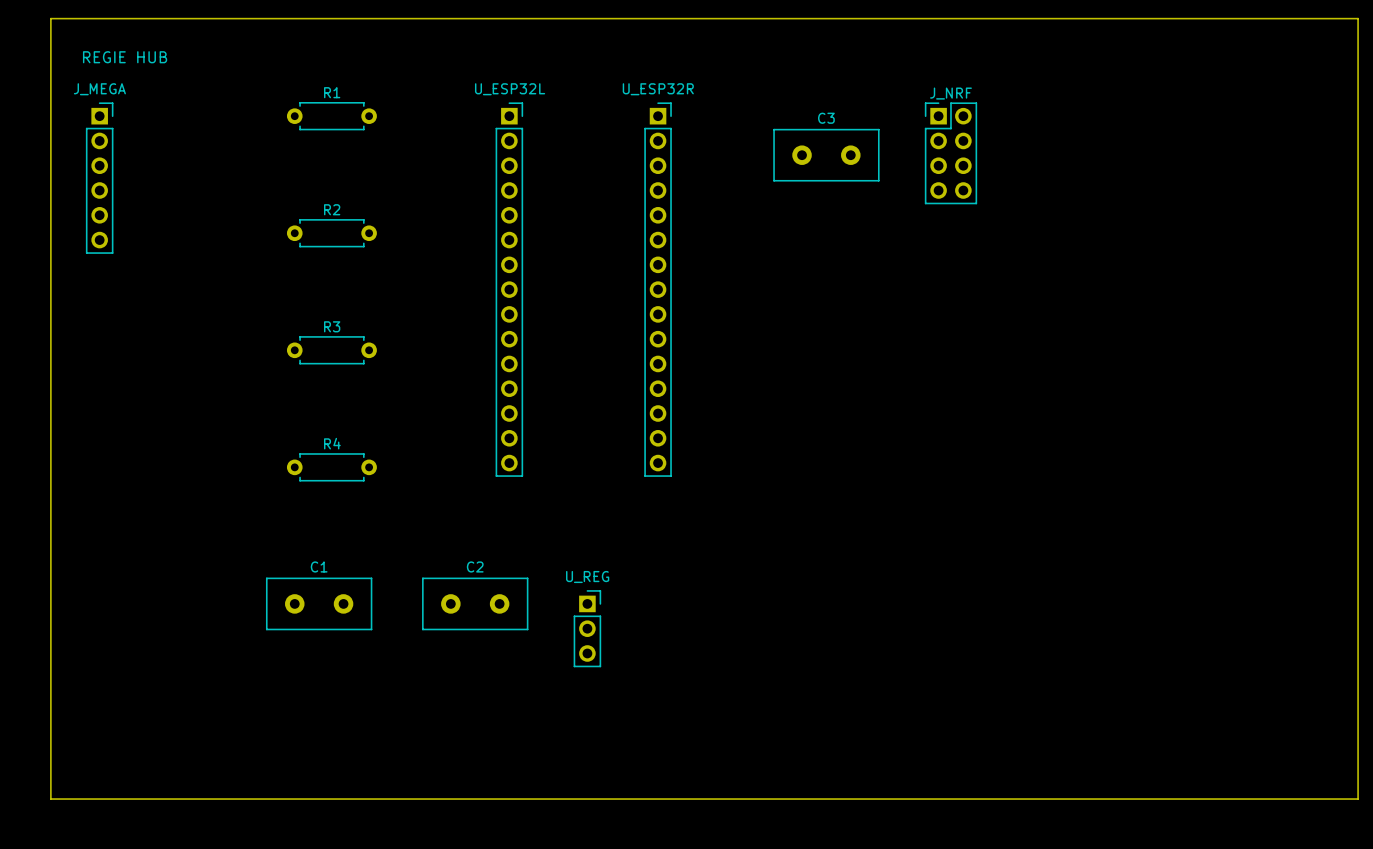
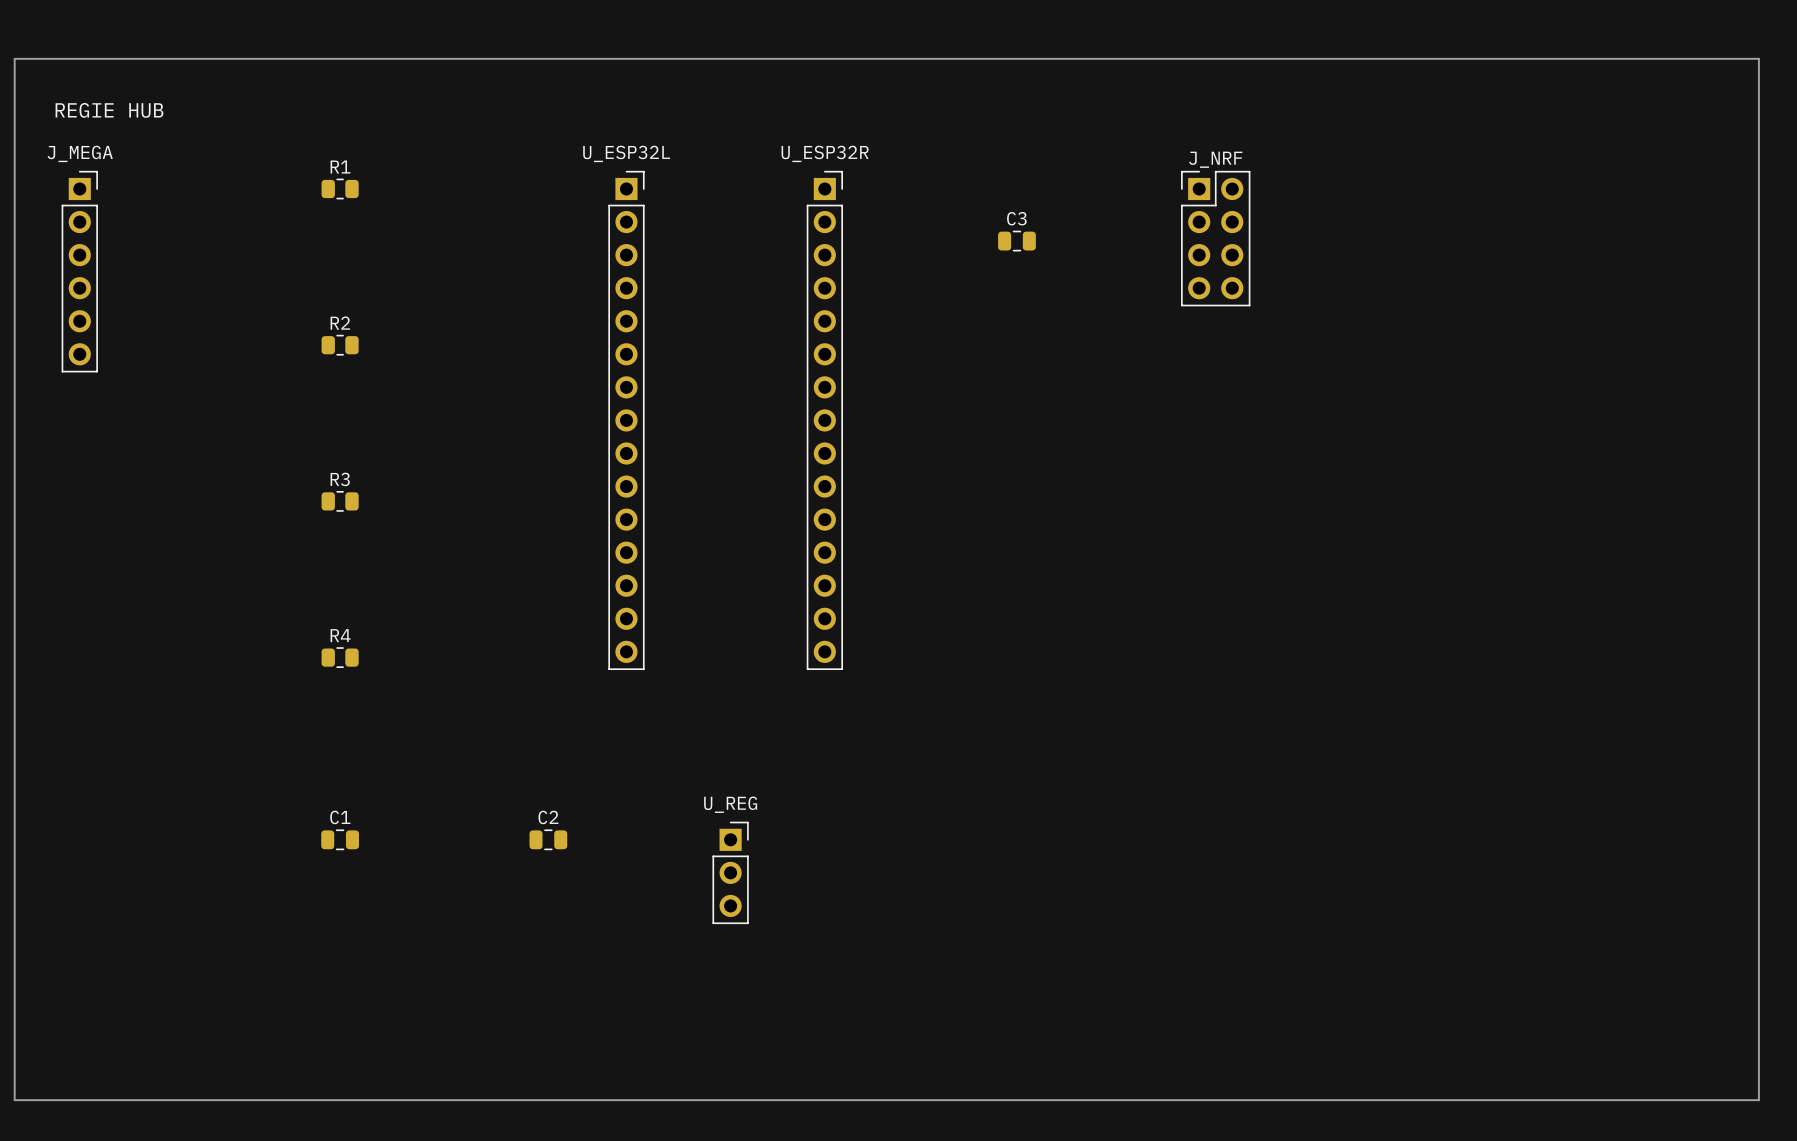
R1 footprint: [286, 102, 377, 131] -> [321, 178, 359, 200]
C3 name position: C3 (826, 118) -> C3 (1016, 218)
C3 footprint: [773, 129, 880, 182] -> [998, 230, 1036, 252]
R2 footprint: [286, 219, 377, 248] -> [321, 334, 359, 356]
R3 footprint: [286, 336, 377, 365] -> [321, 491, 359, 512]
R4 footprint: [286, 453, 377, 482] -> [321, 647, 359, 668]
C1 name position: C1 (319, 566) -> C1 (340, 817)
C2 name position: C2 (475, 566) -> C2 (548, 817)
C1 footprint: [266, 577, 373, 631] -> [321, 829, 359, 851]
C2 footprint: [422, 577, 529, 631] -> [529, 829, 568, 851]

